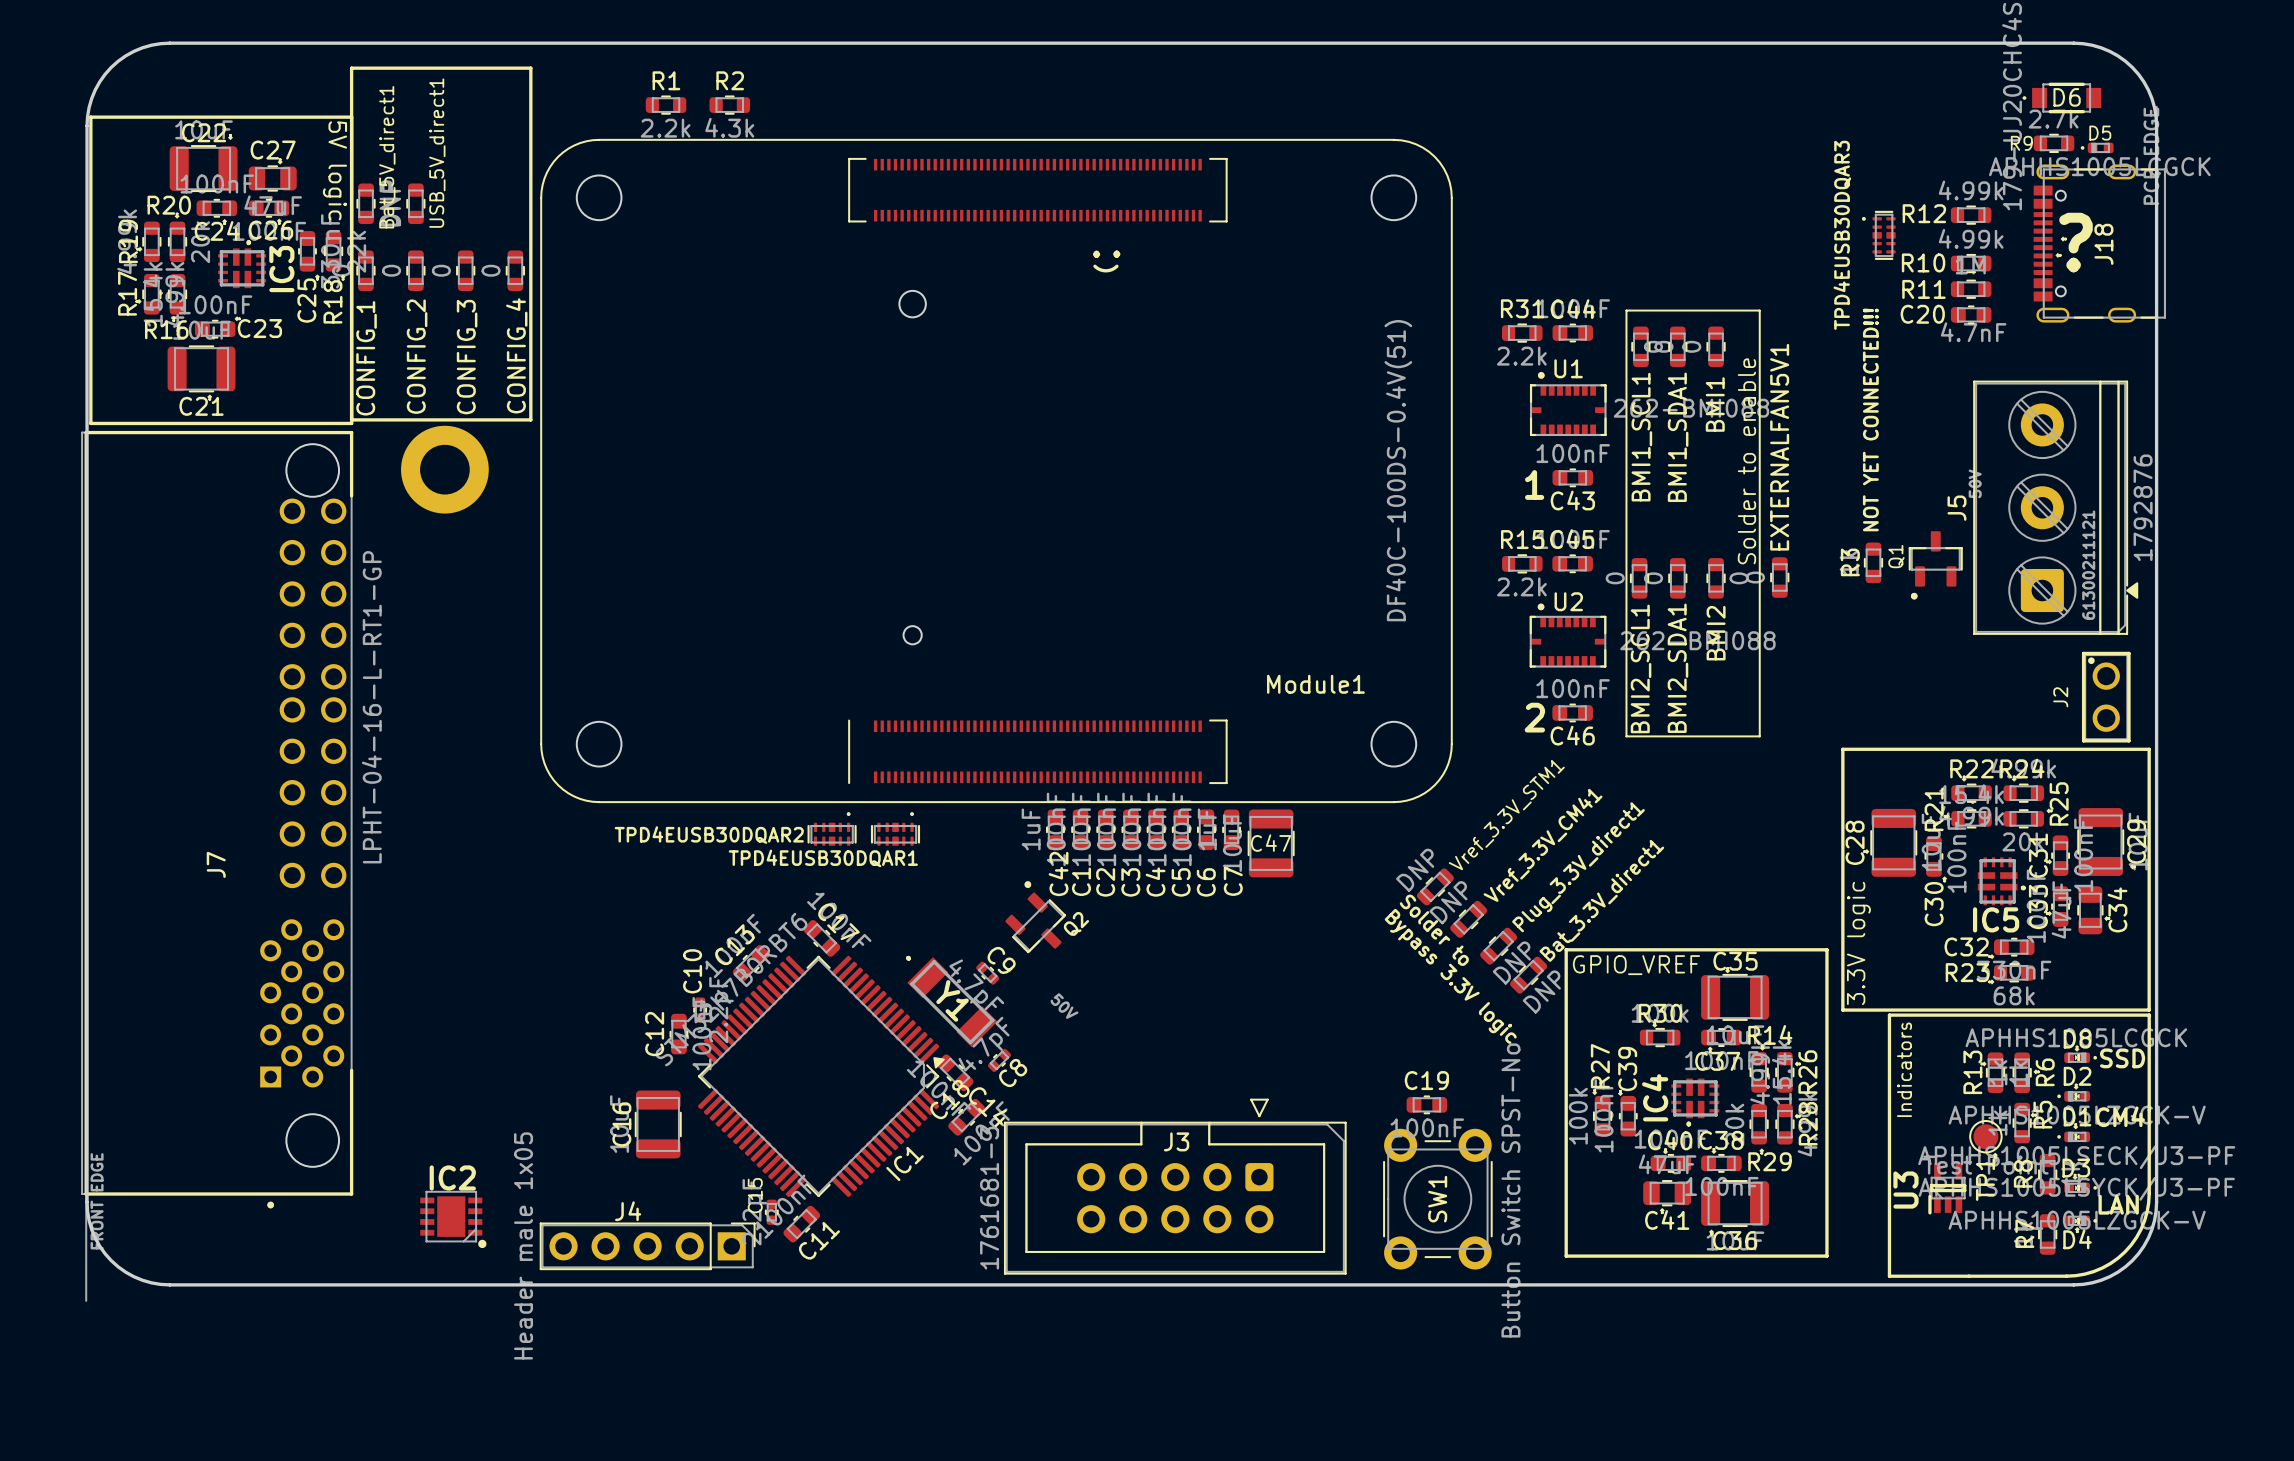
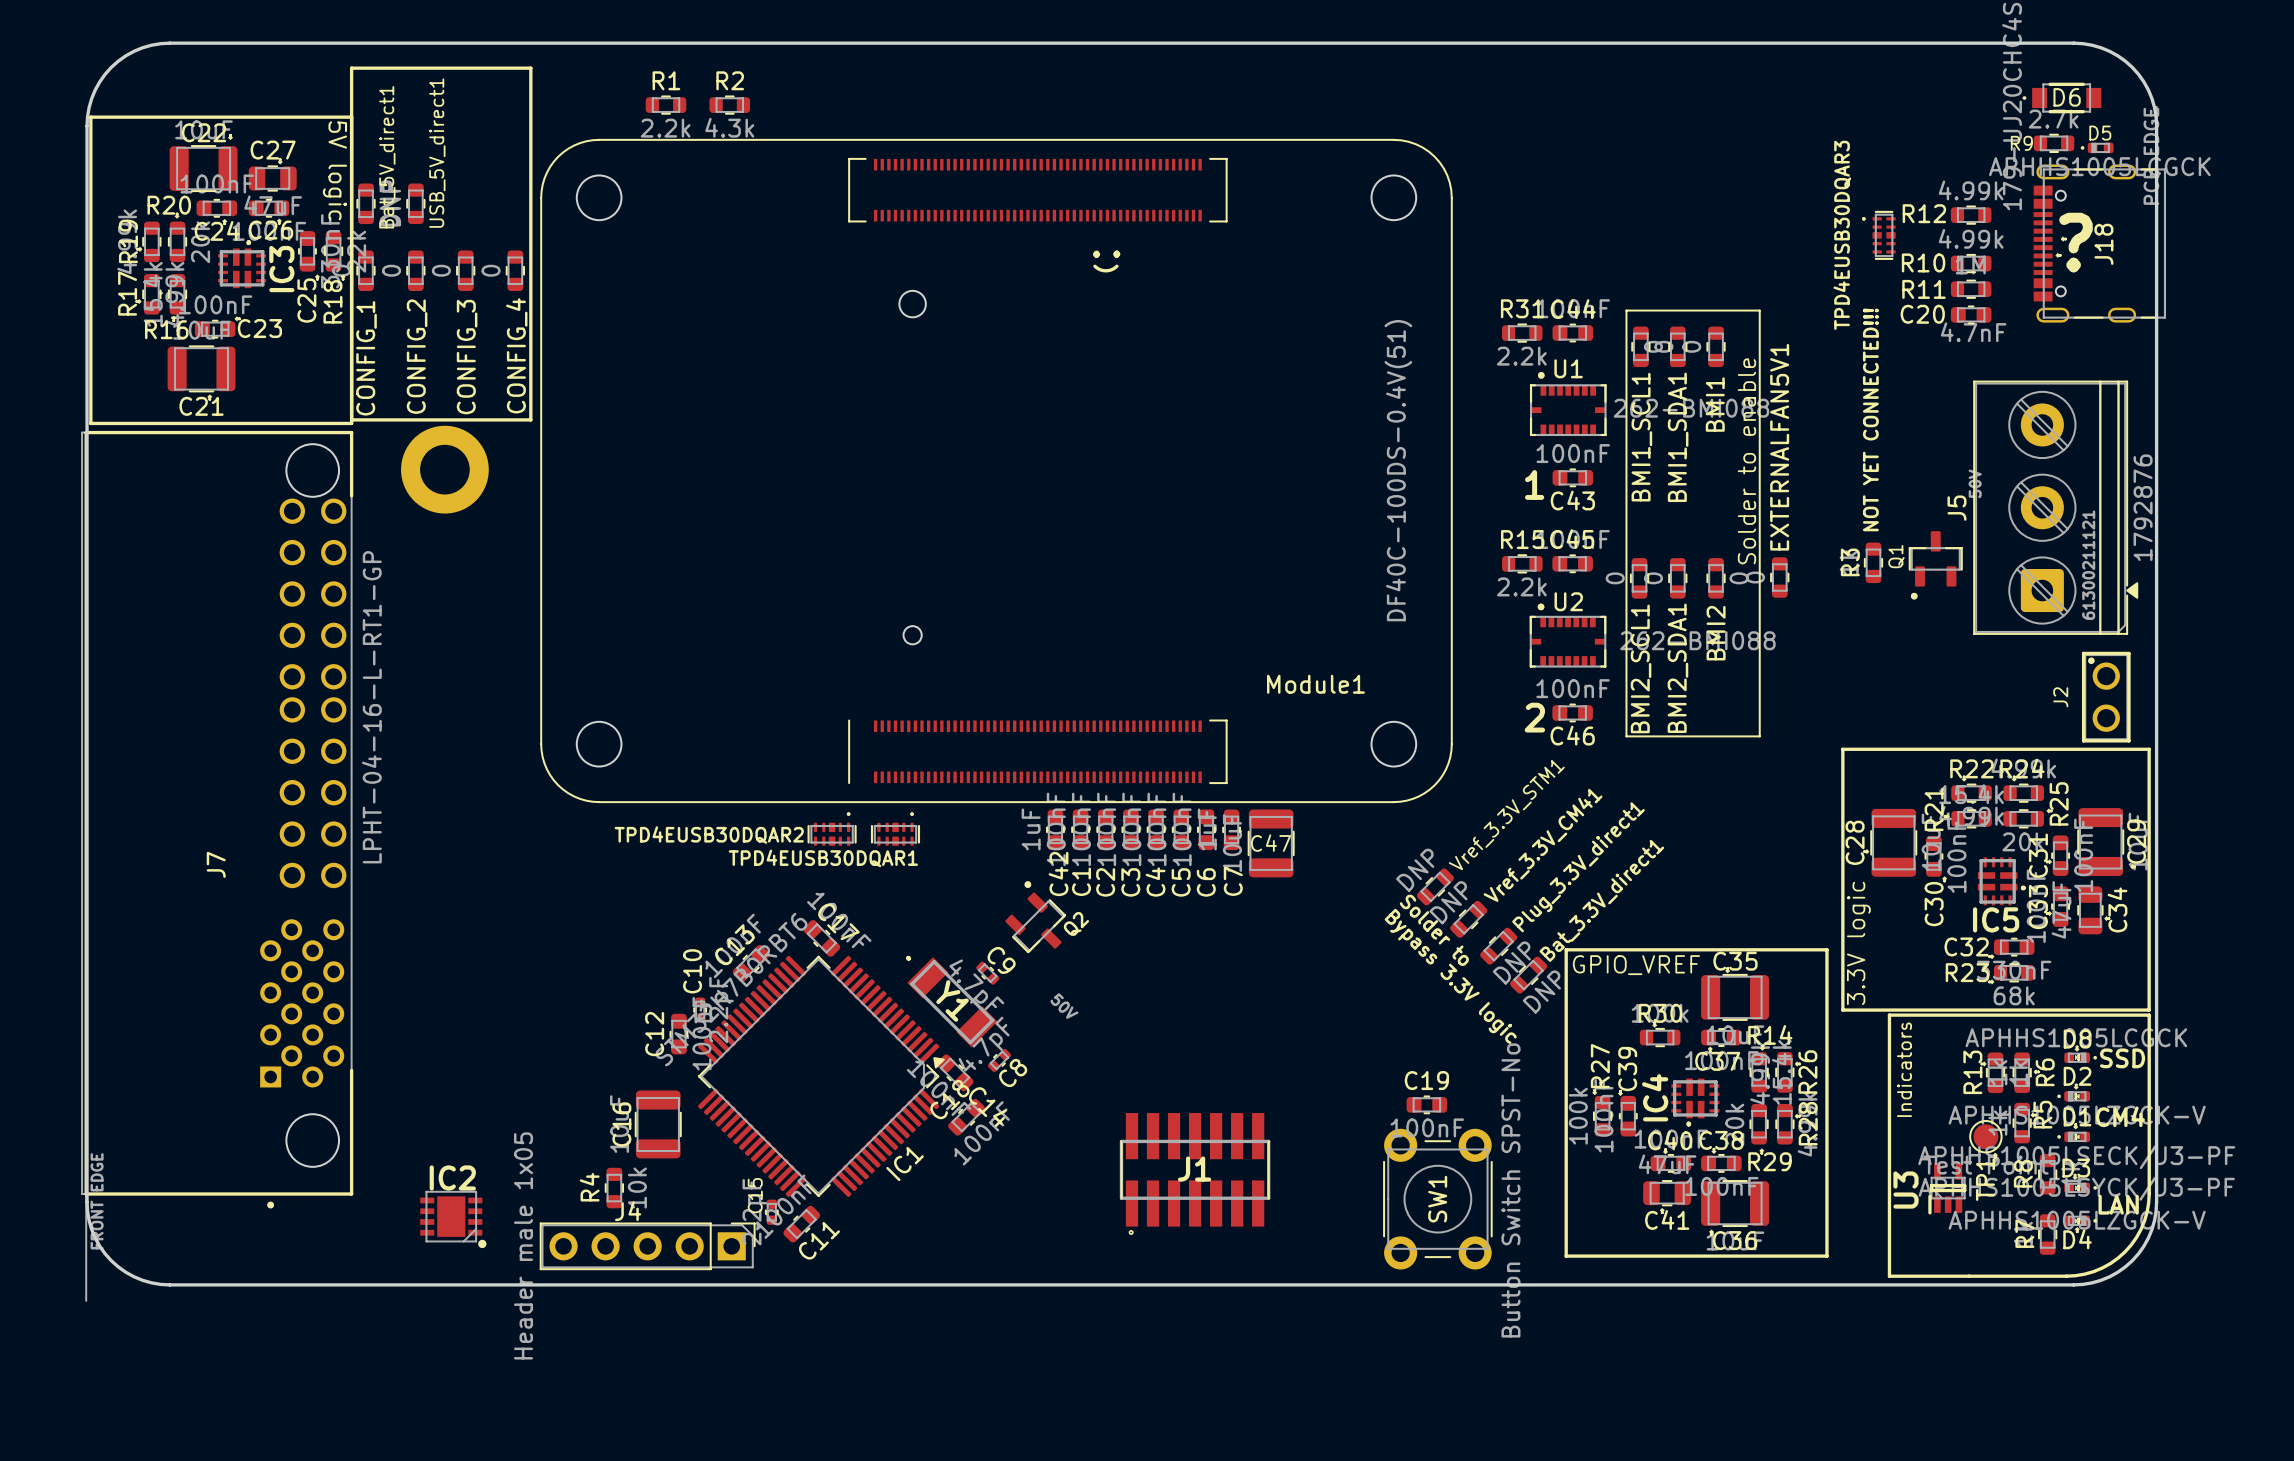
J1: none -> (1195, 1174)
J3: 1761681-3 (1175, 1186) -> none
R4: none -> 10k (614, 1188)

